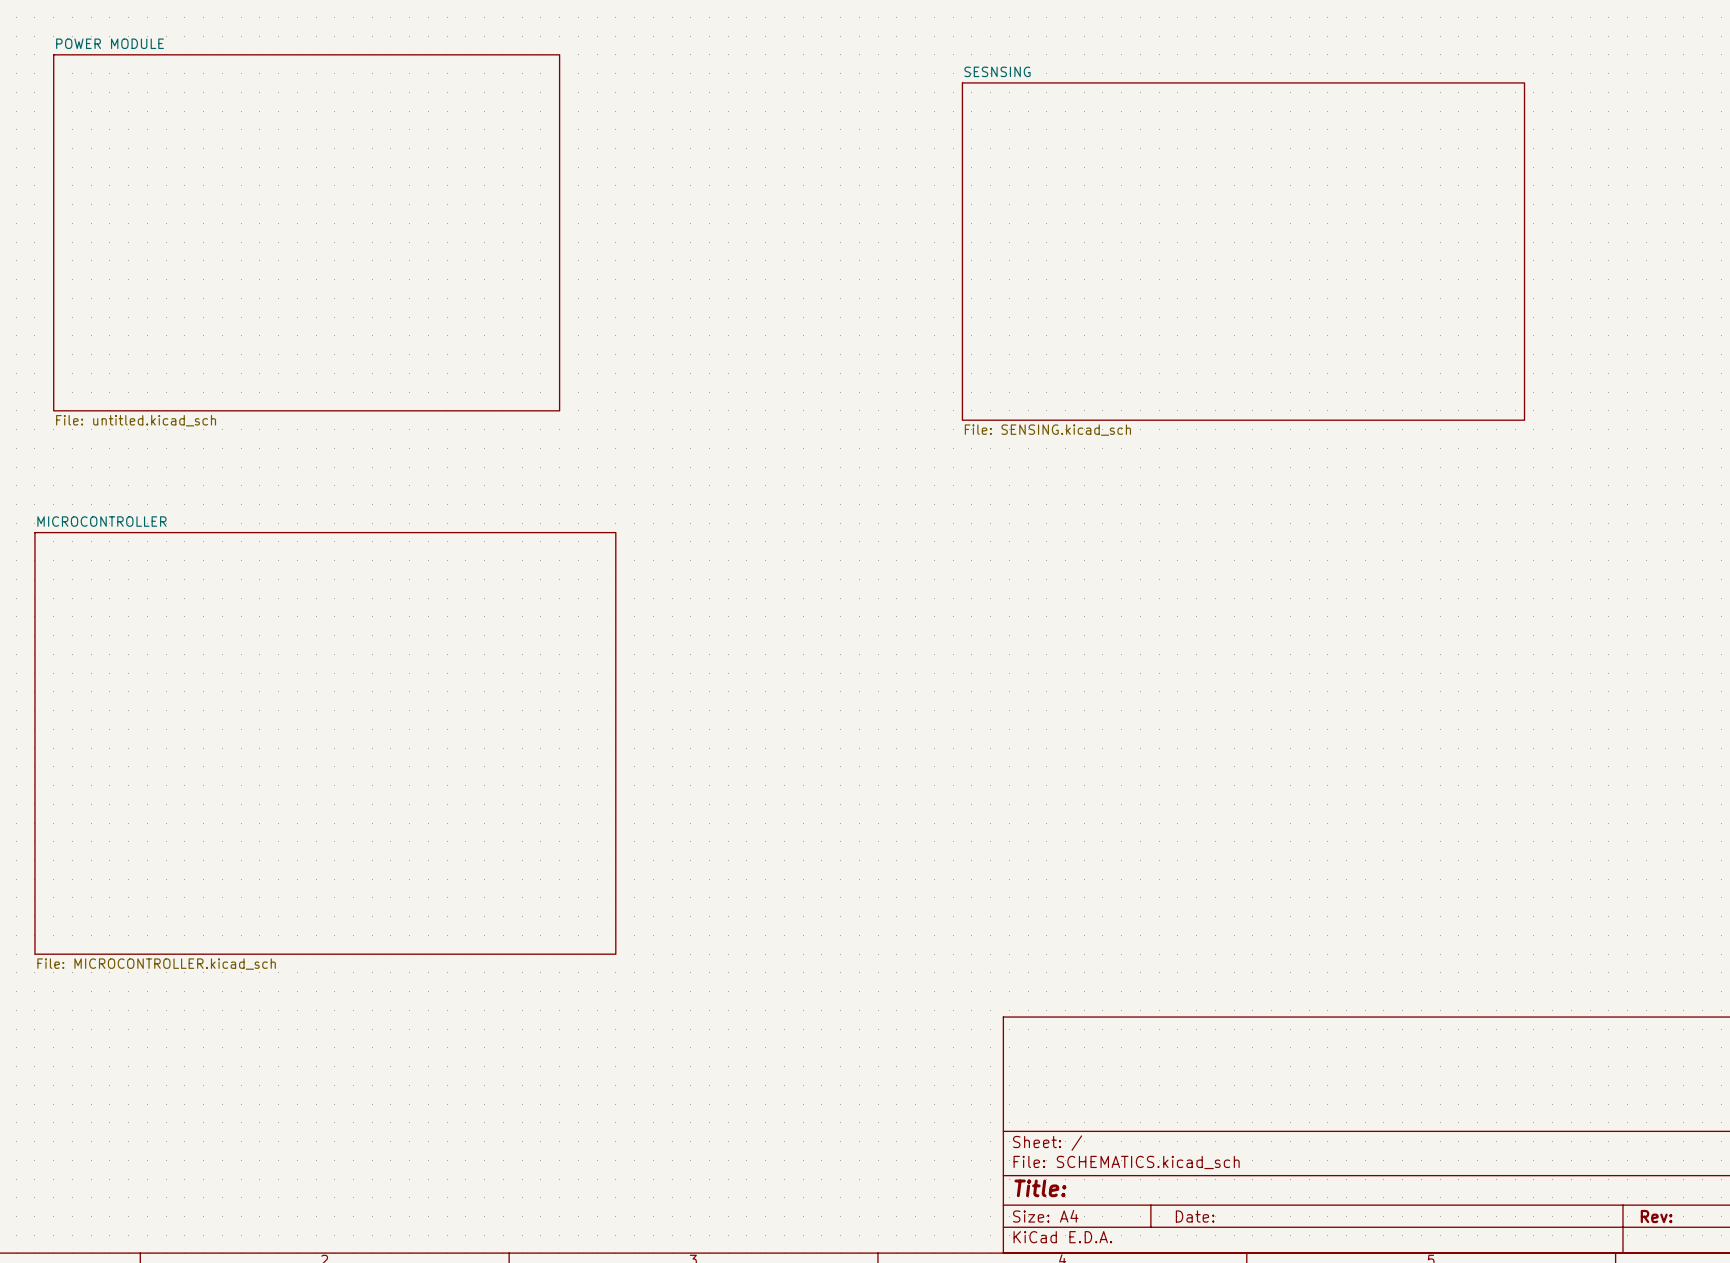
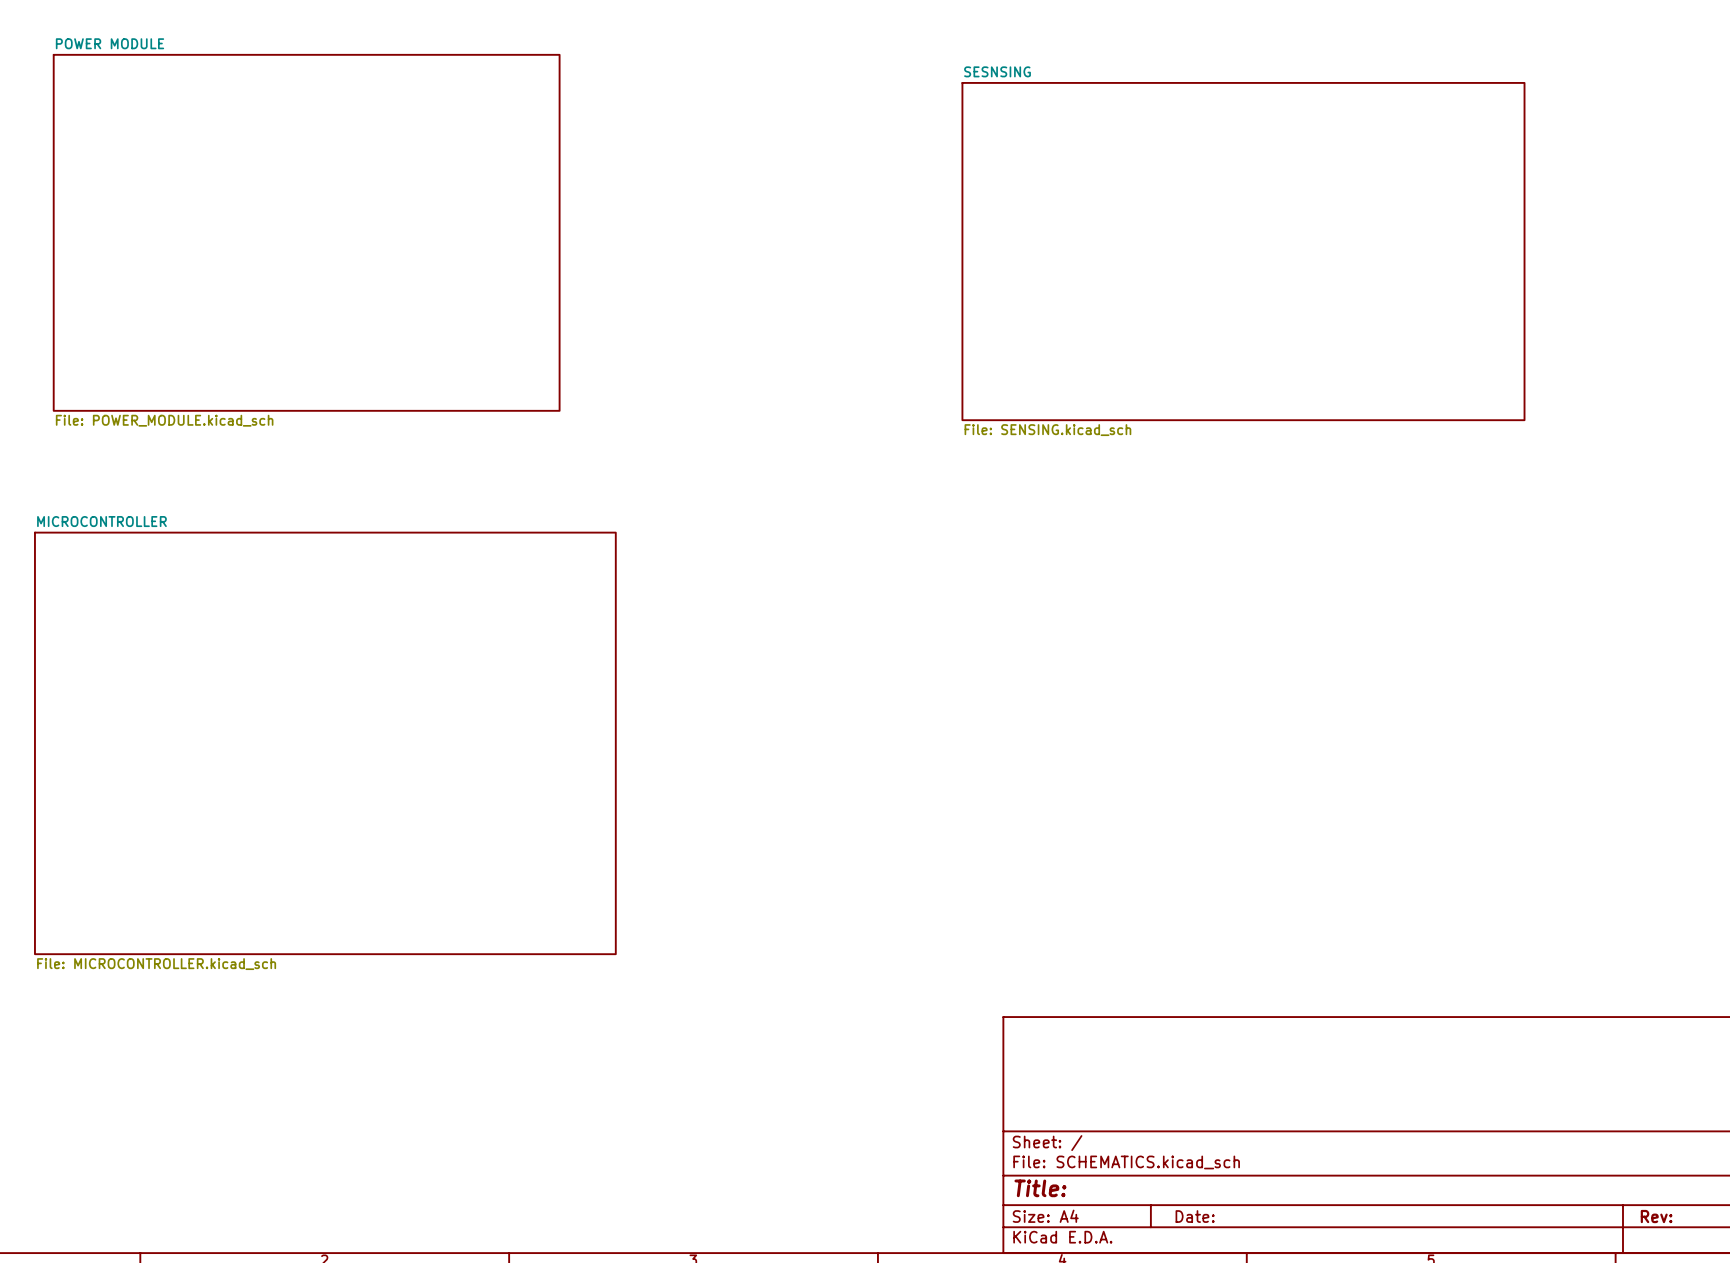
sheet POWER MODULE value: File: untitled.kicad_sch (136, 420) -> File: POWER_MODULE.kicad_sch (164, 420)

